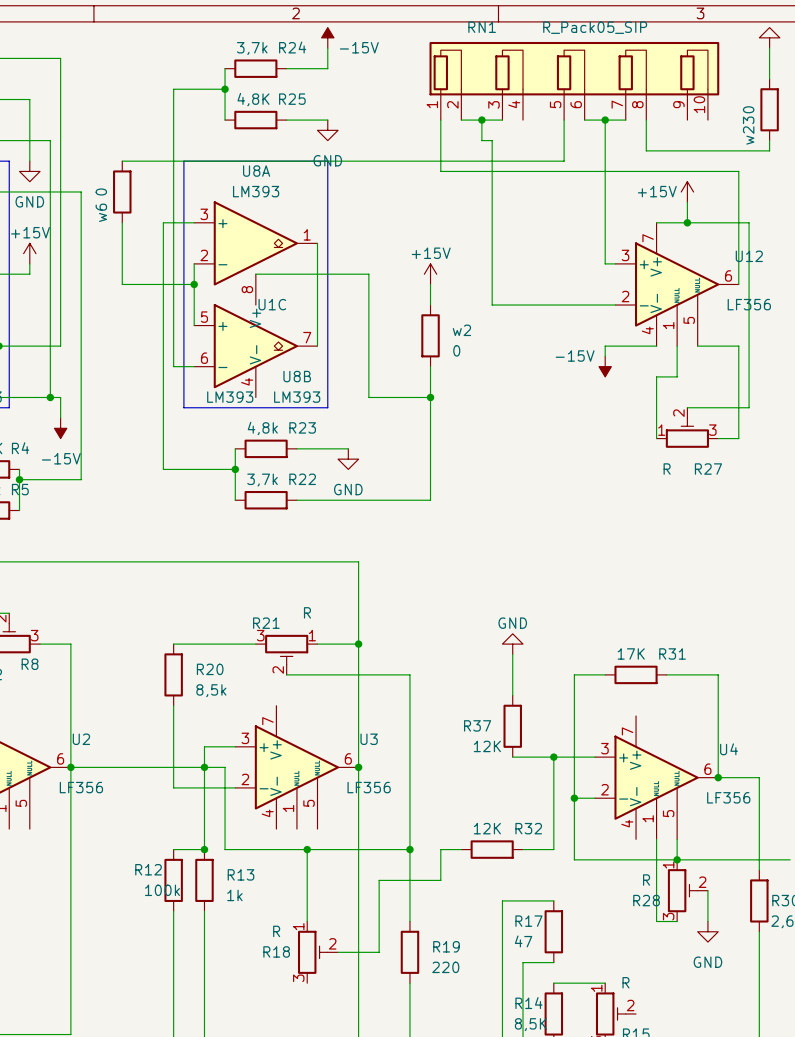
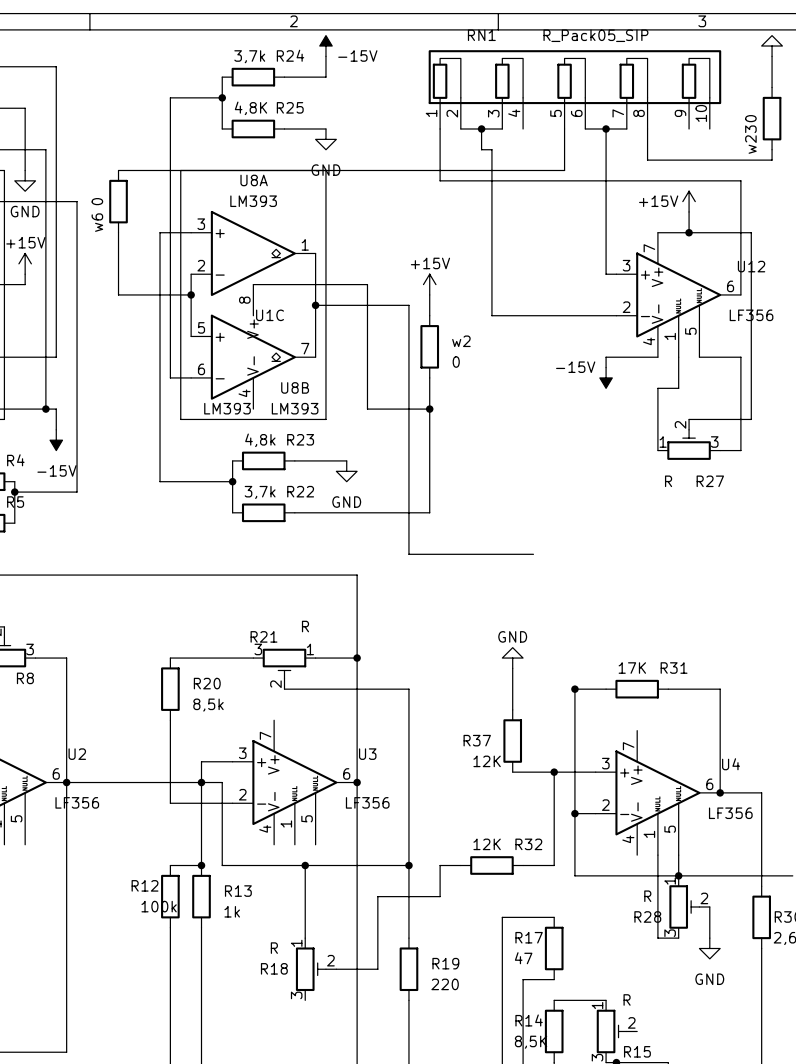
wire: none -> (315, 305) (408, 305) (408, 554) (533, 554)
junction: none -> (315, 305)
junction: none -> (574, 689)

